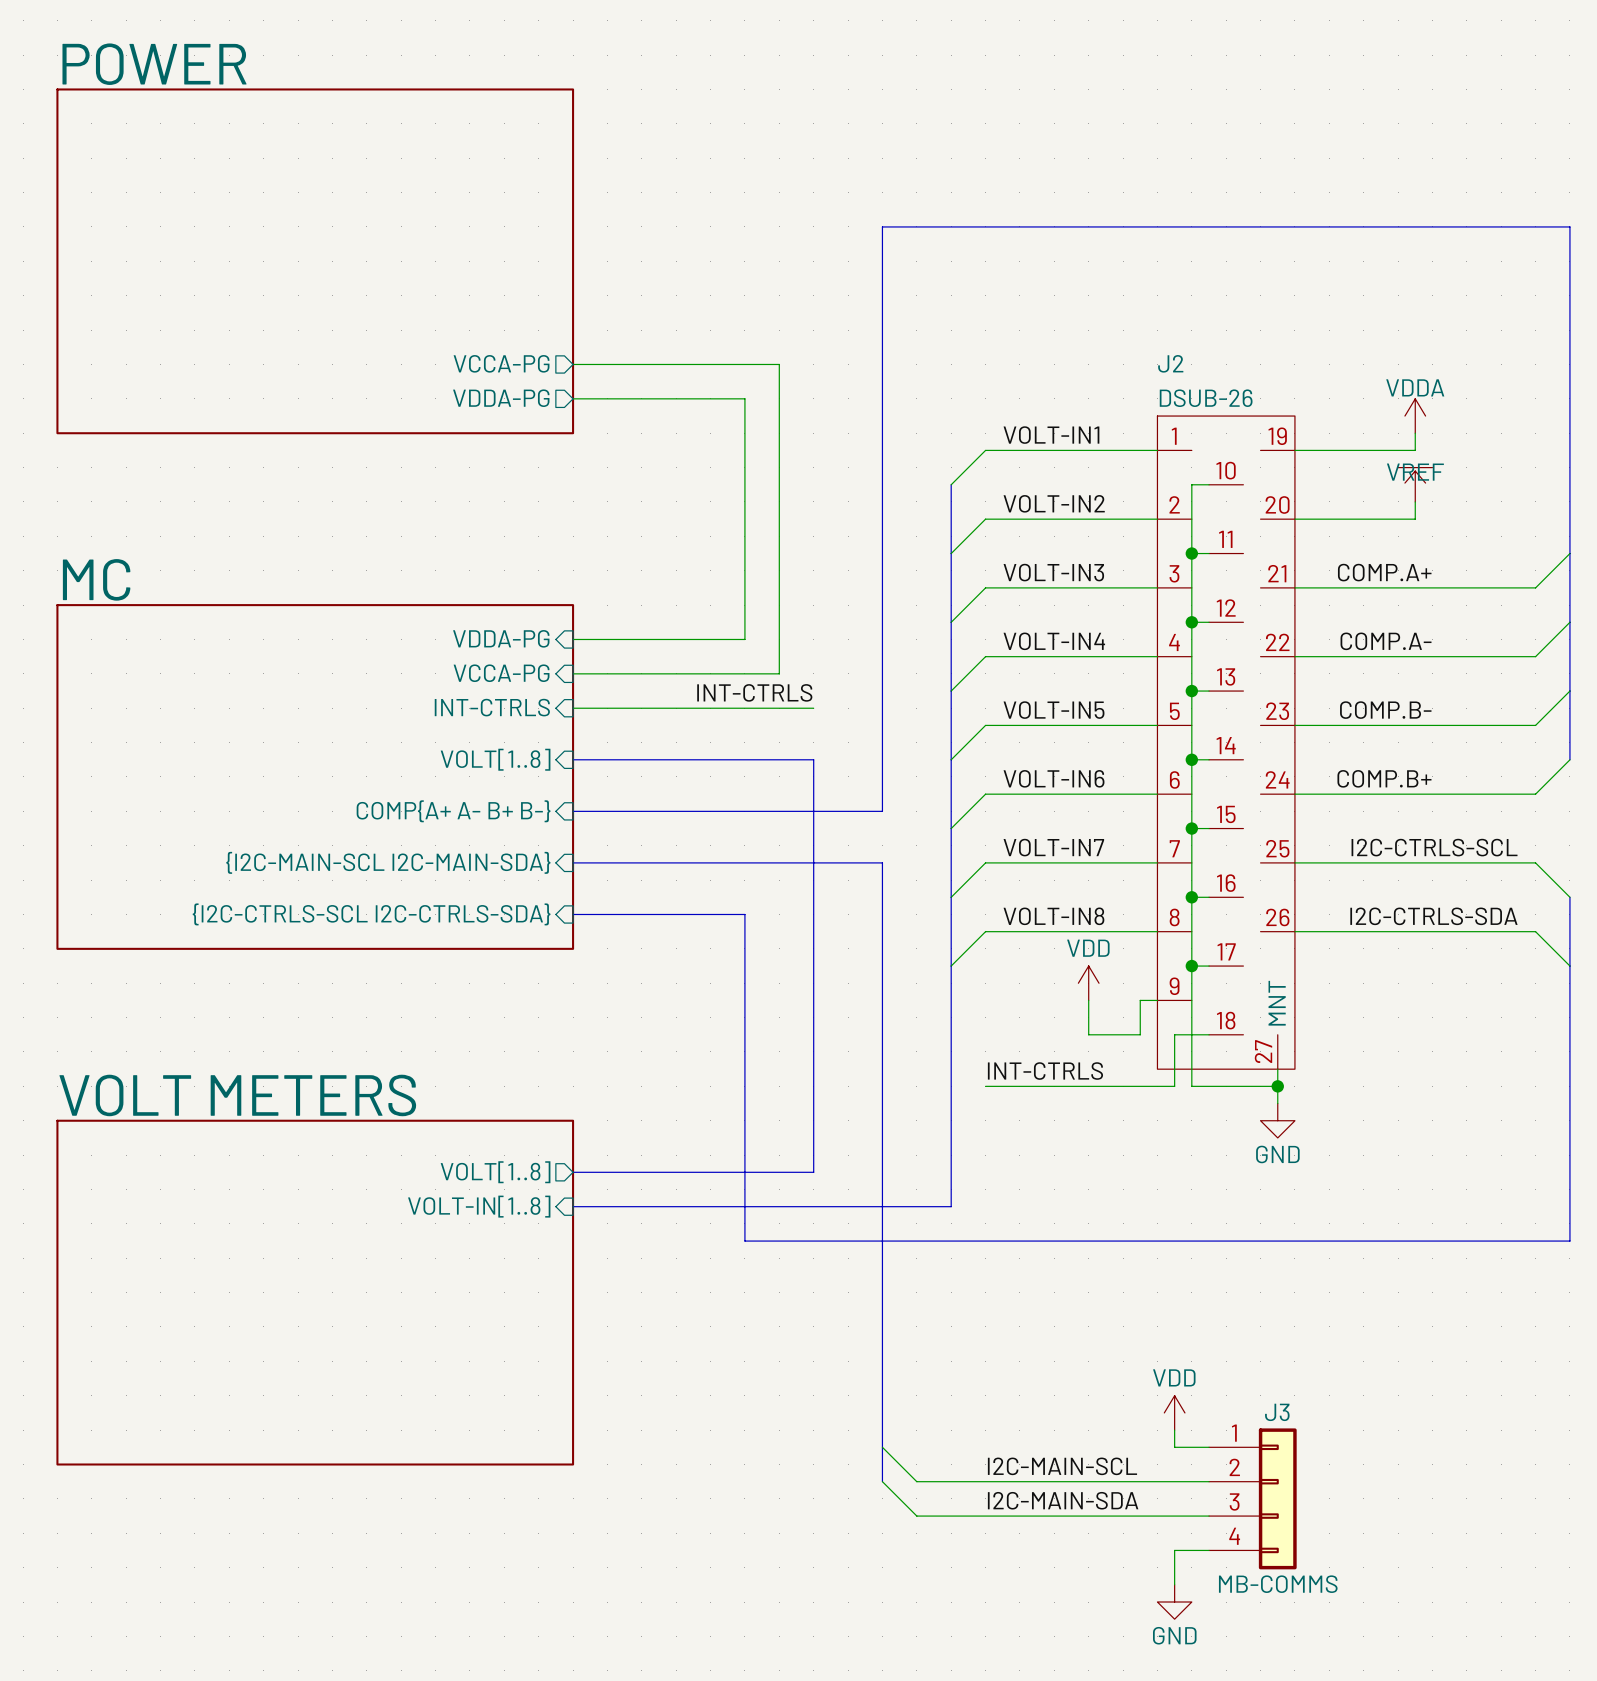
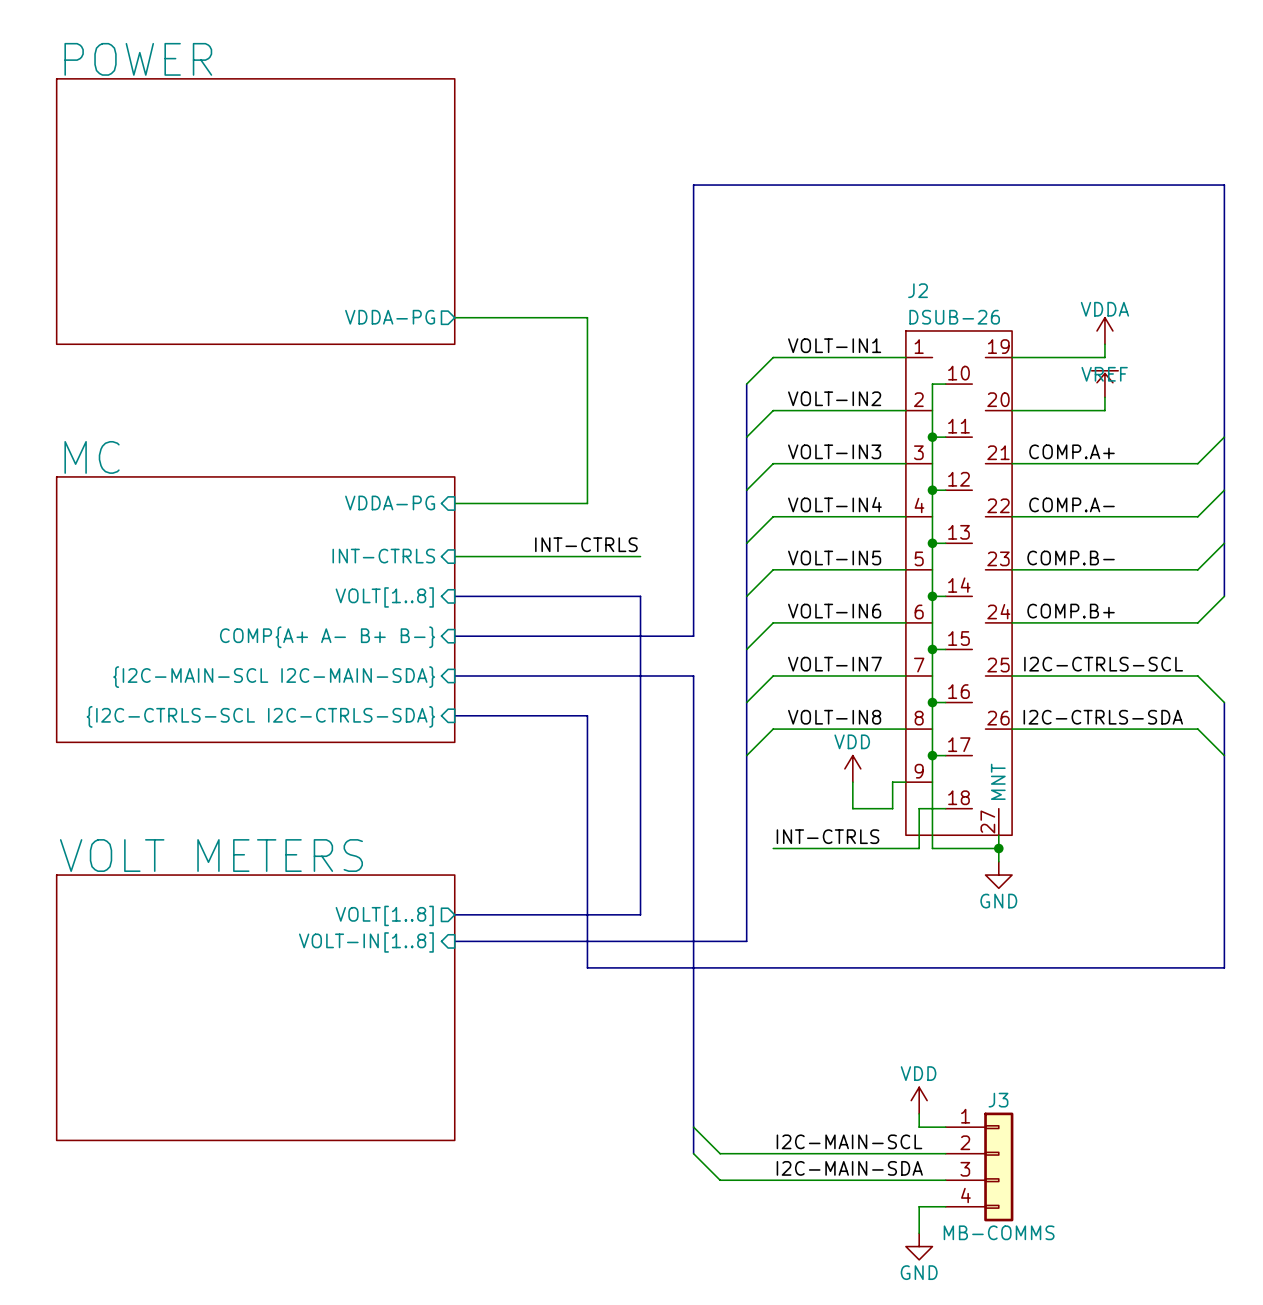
sheet pin: VCCA-PG (501, 363) -> none
wire: (573, 364) (779, 364) (779, 673) (573, 673) -> none
sheet pin: VCCA-PG (501, 673) -> none

